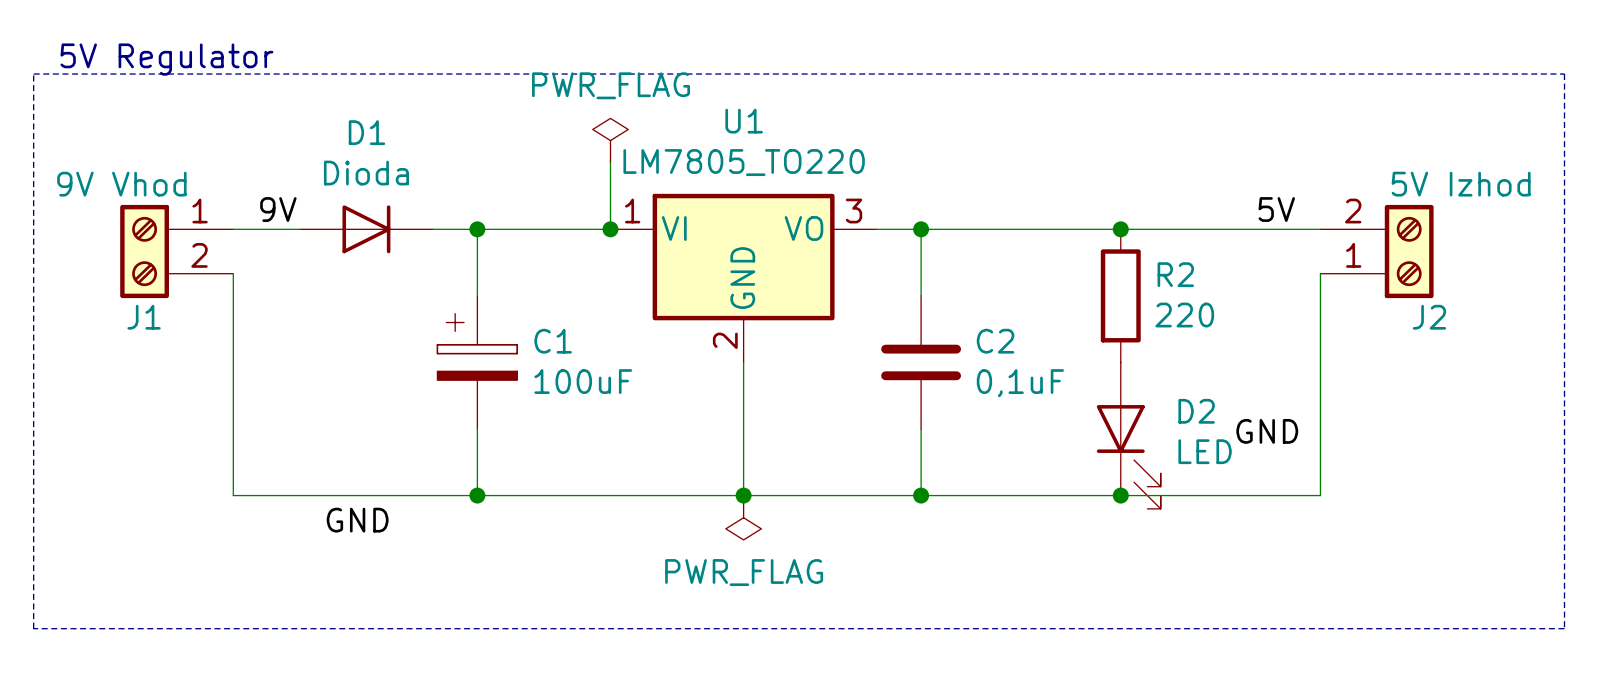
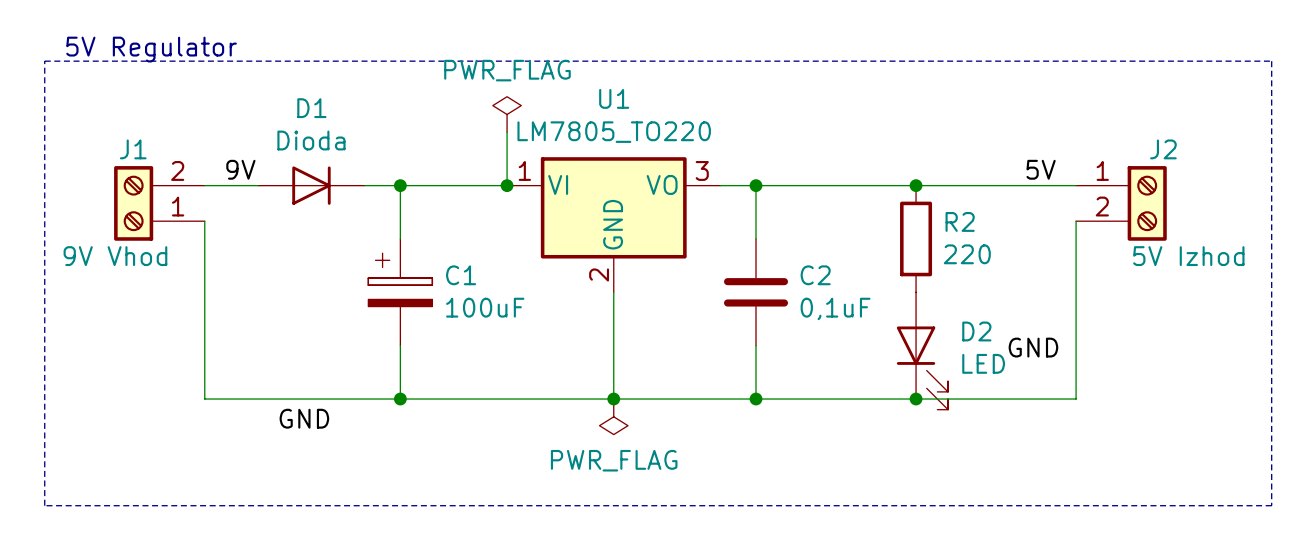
J1 flip: as is (144, 251) -> up-down (133, 203)
J2 flip: as is (1409, 251) -> up-down (1147, 203)

